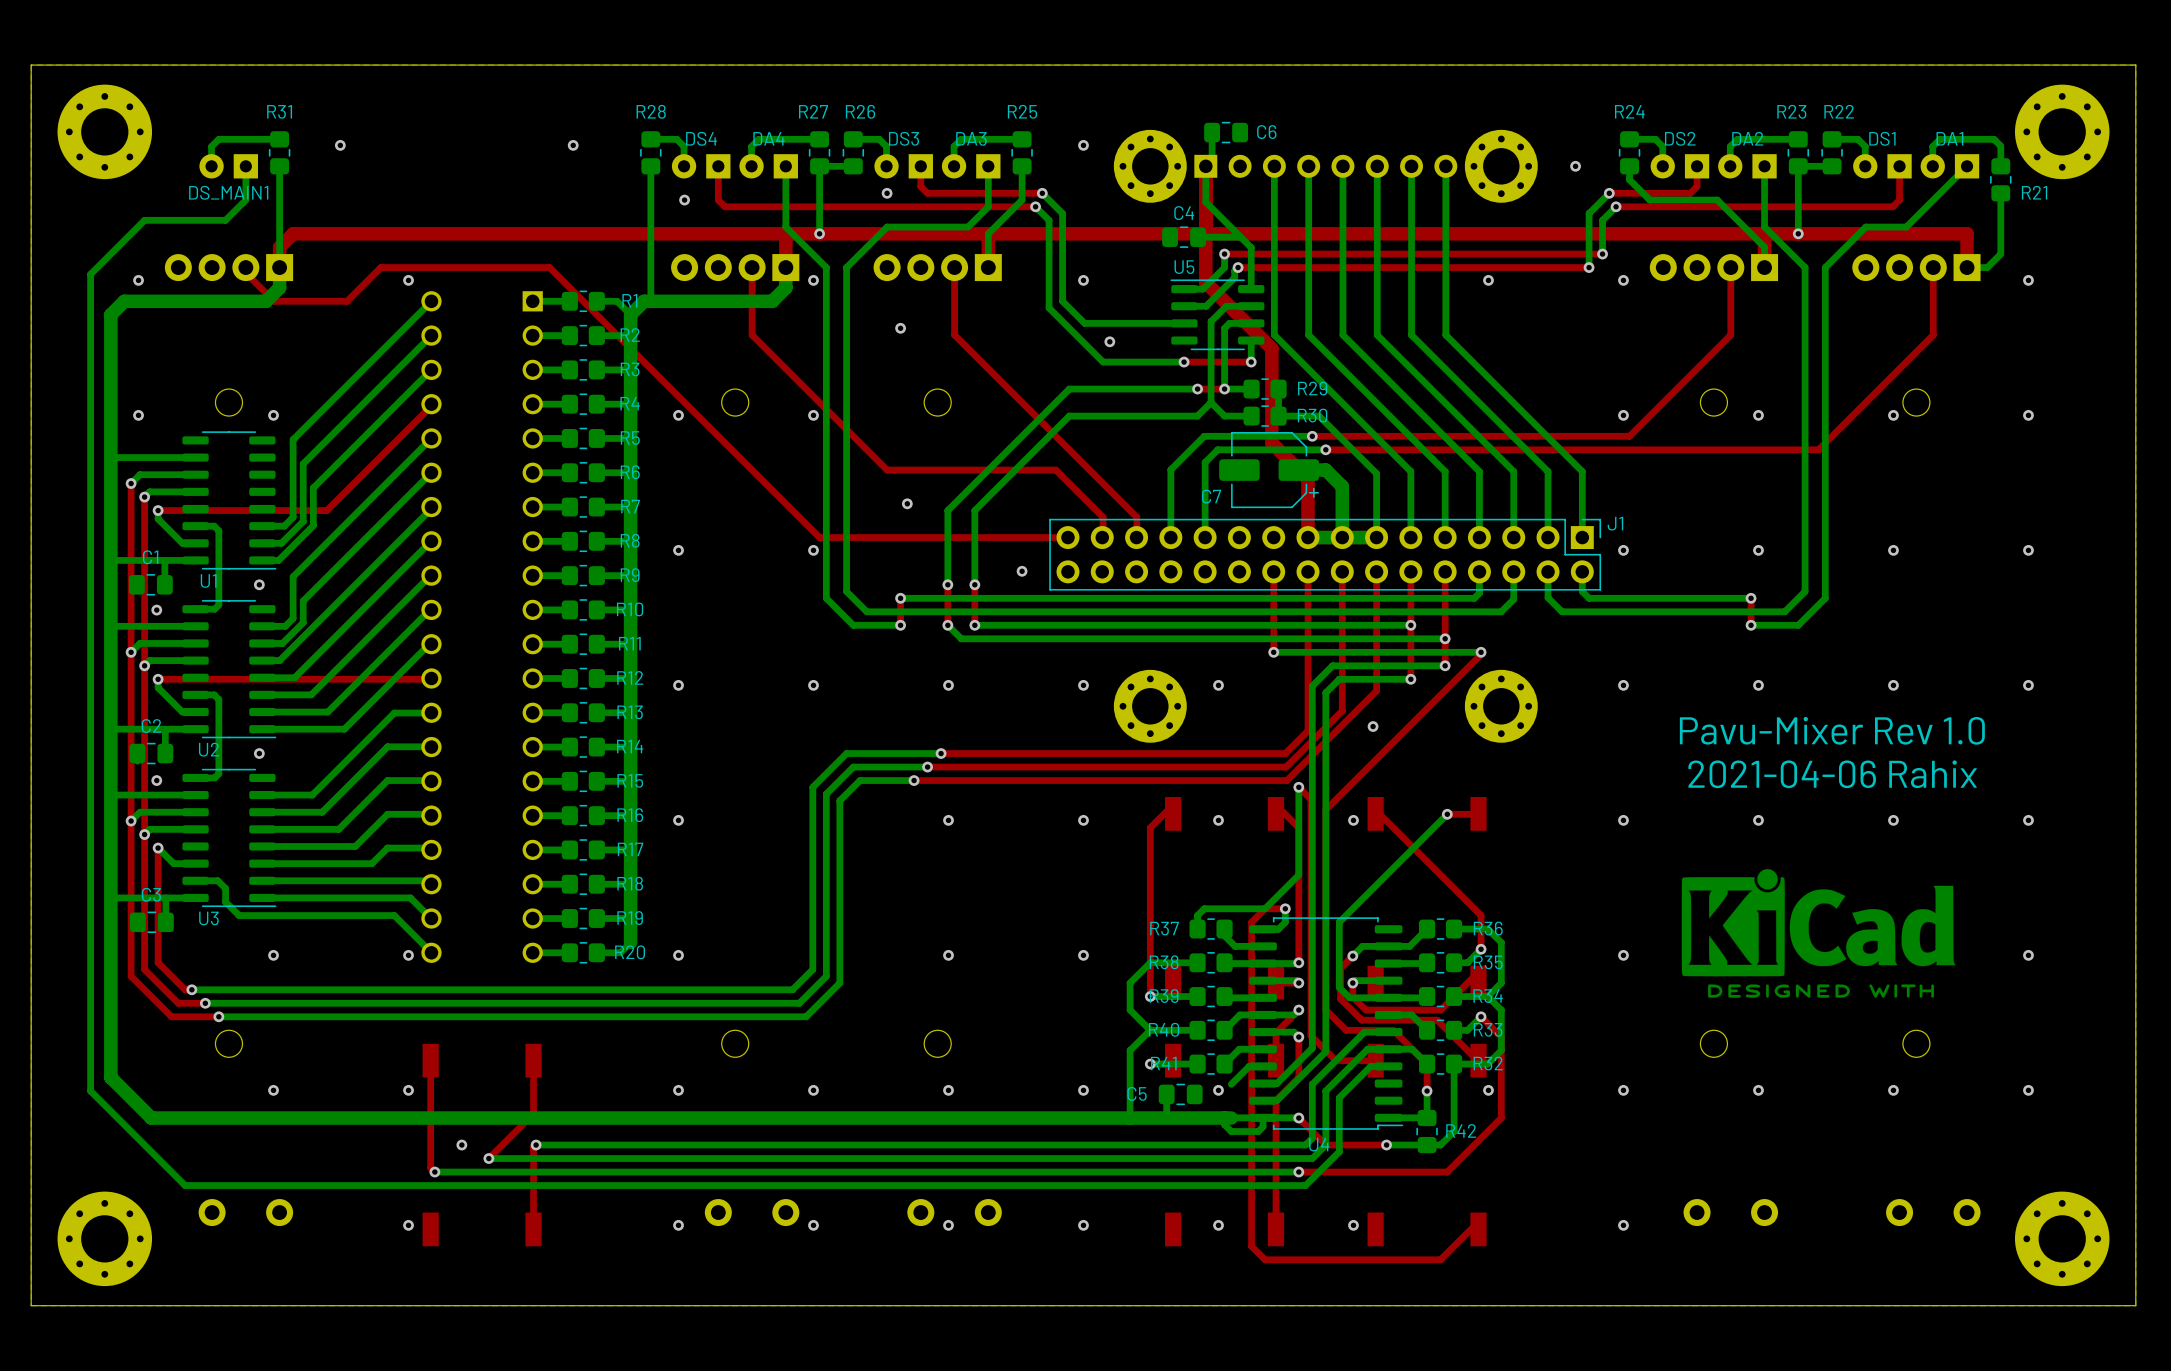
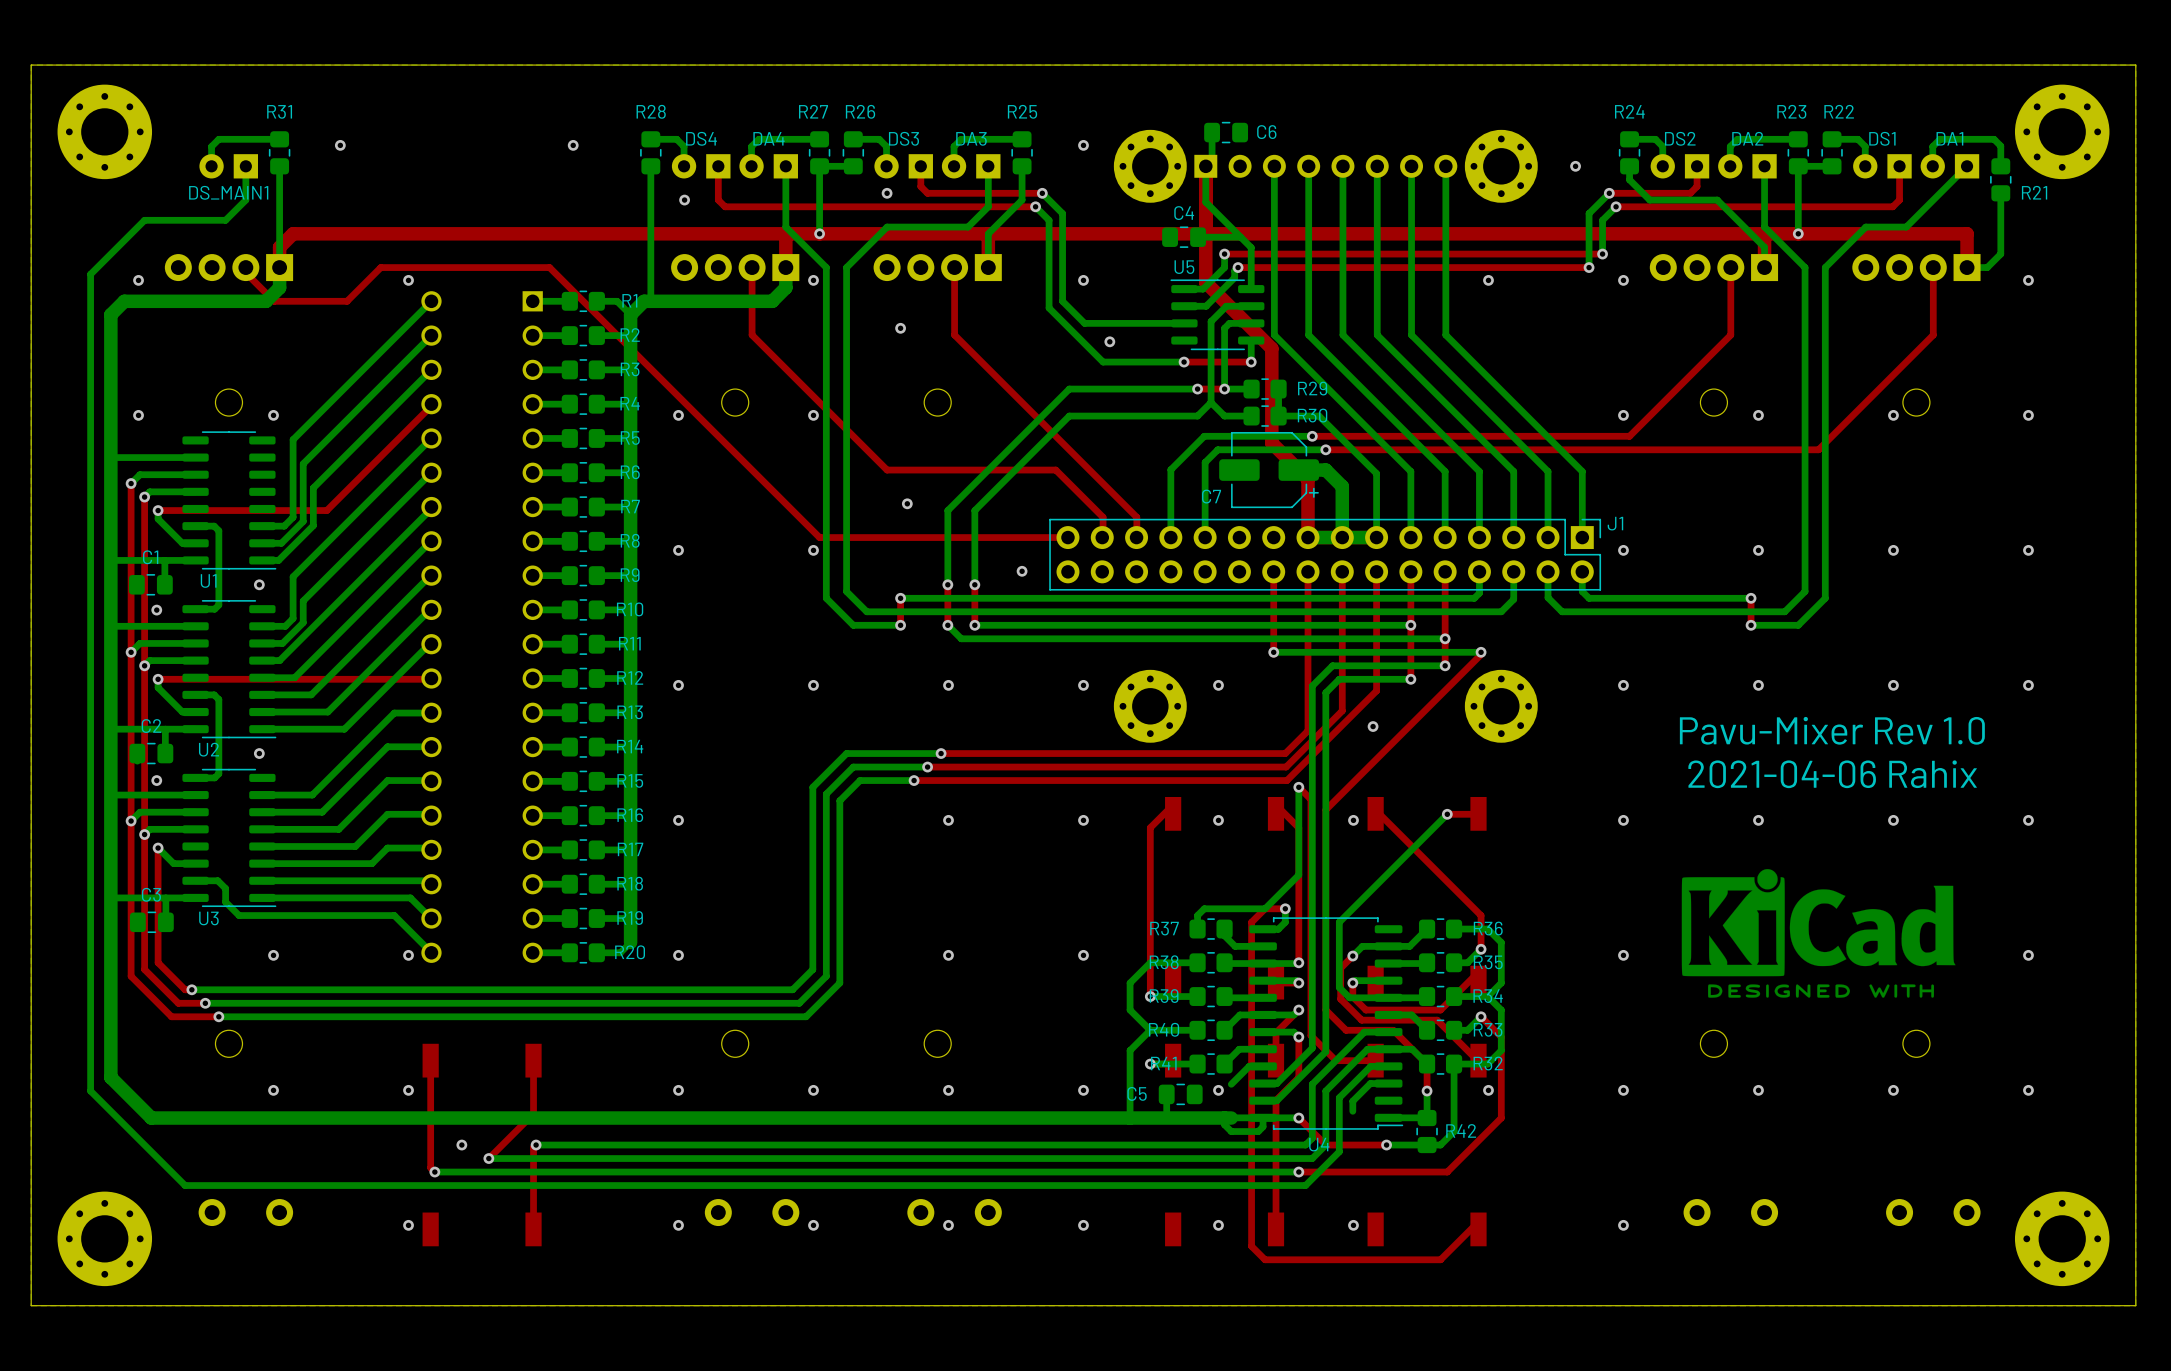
bottom track: none -> (1388, 1083) (1370, 1083) (1352, 1101) (1352, 1111)

